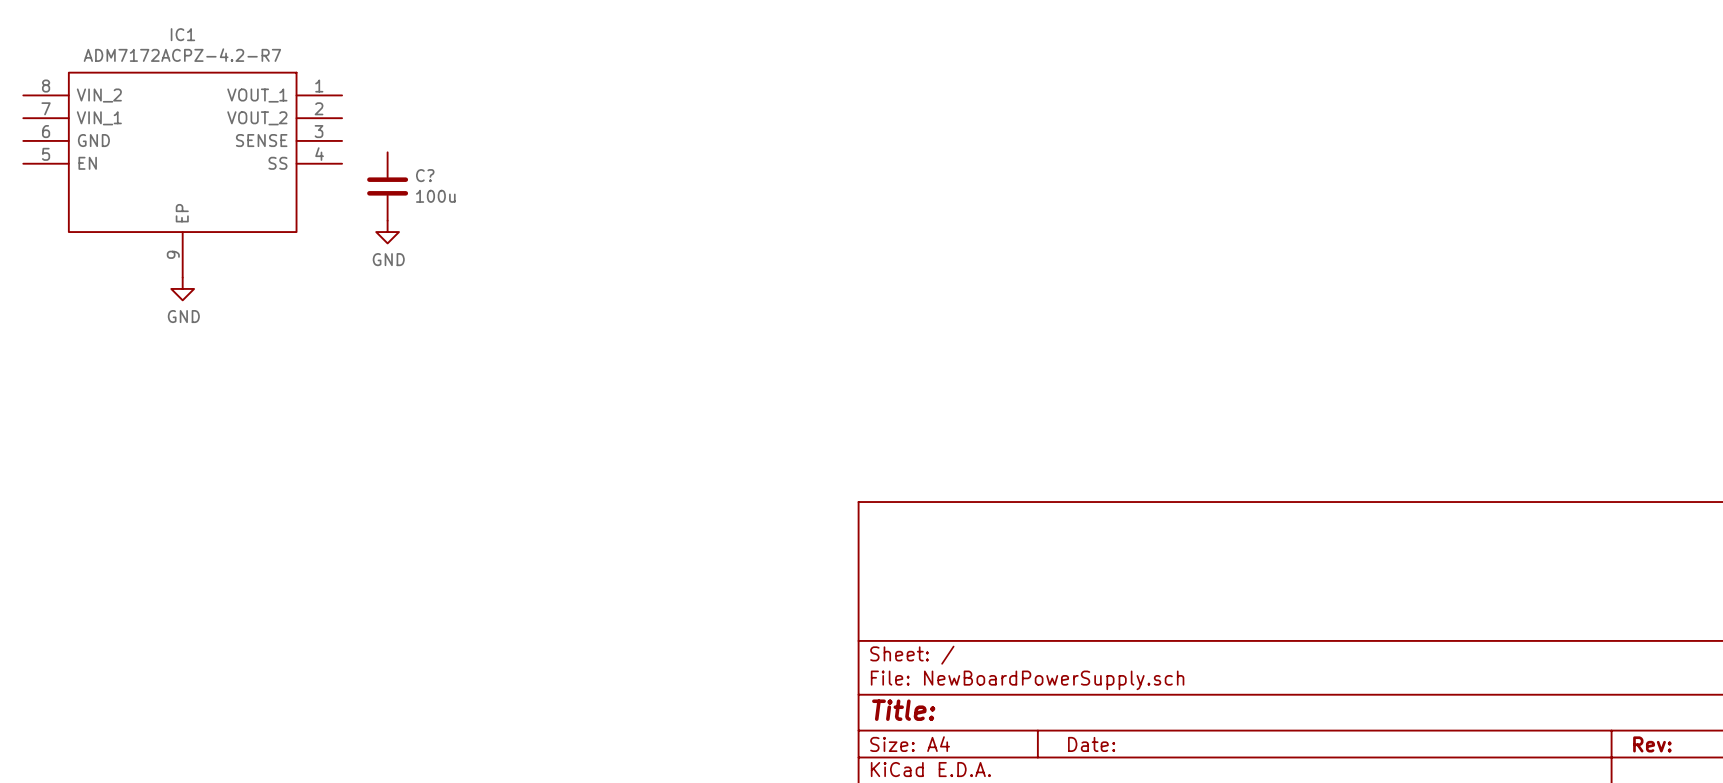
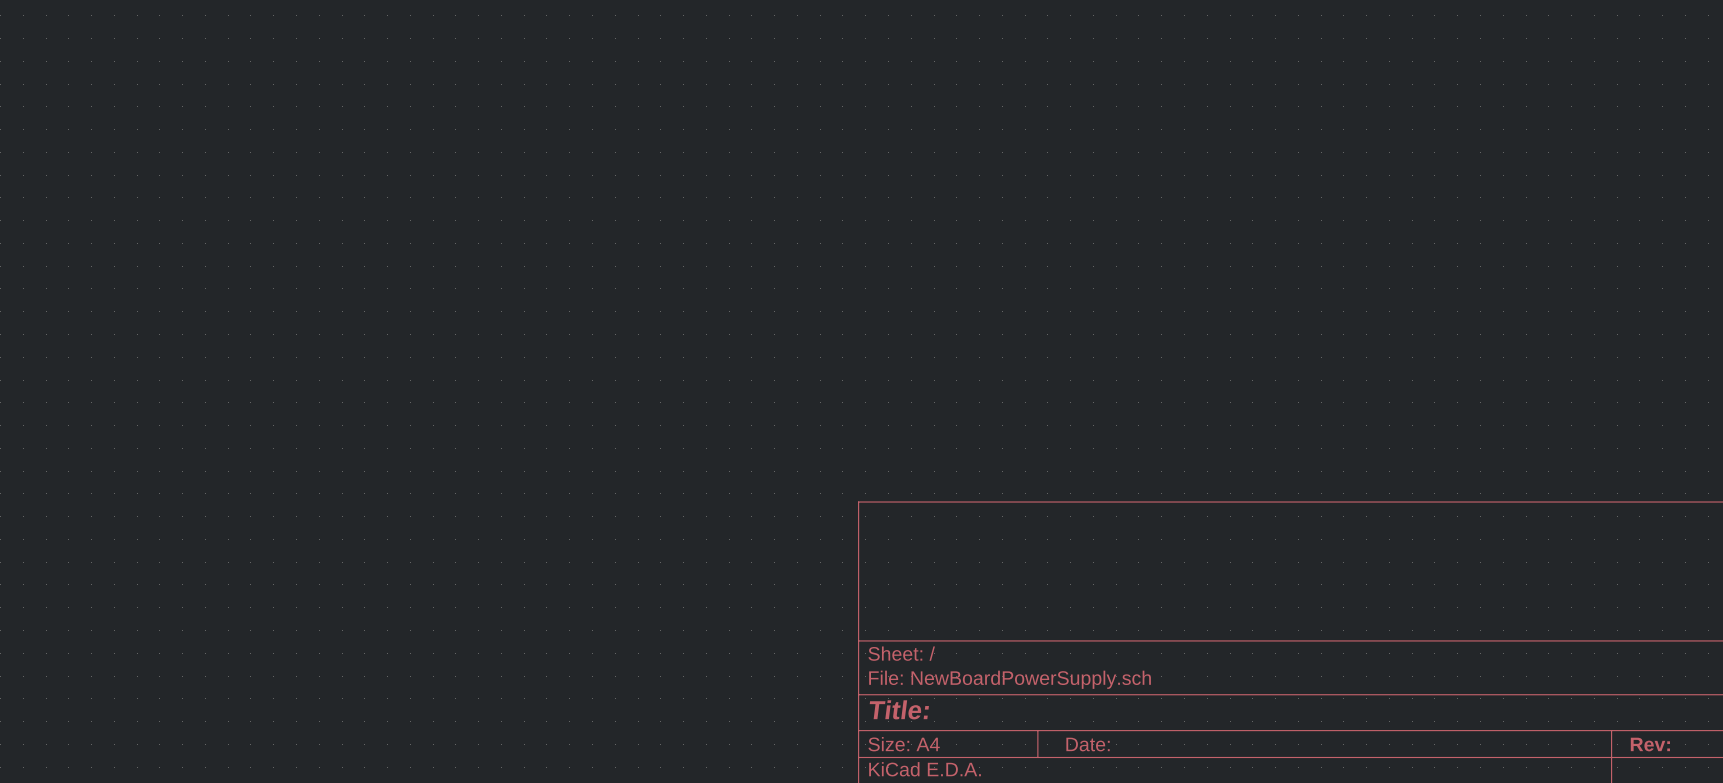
IC1: ADM7172ACPZ-4.2-R7 (182, 174) -> none
C?: 100u (387, 186) -> none
power symbol: GND (387, 232) -> none
power symbol: GND (182, 288) -> none

